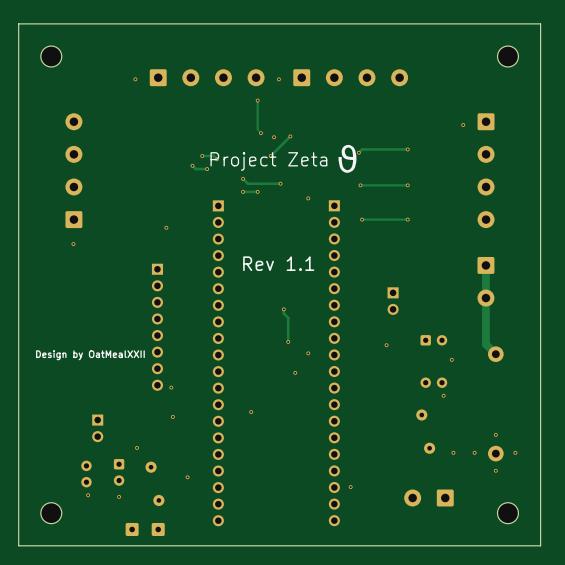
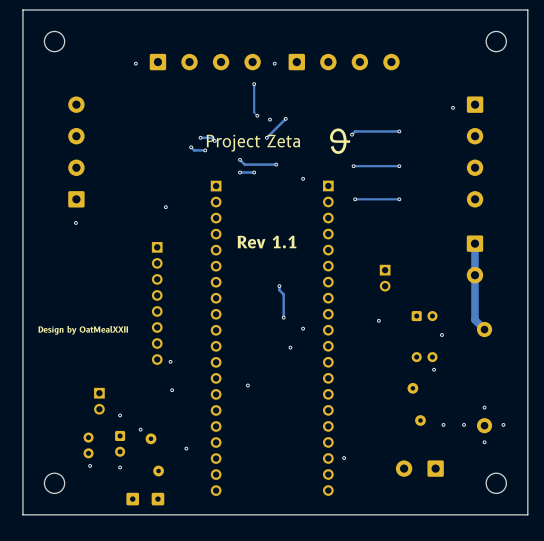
via: none -> (120, 415)
via: (137, 447) -> none
via: none -> (140, 429)

